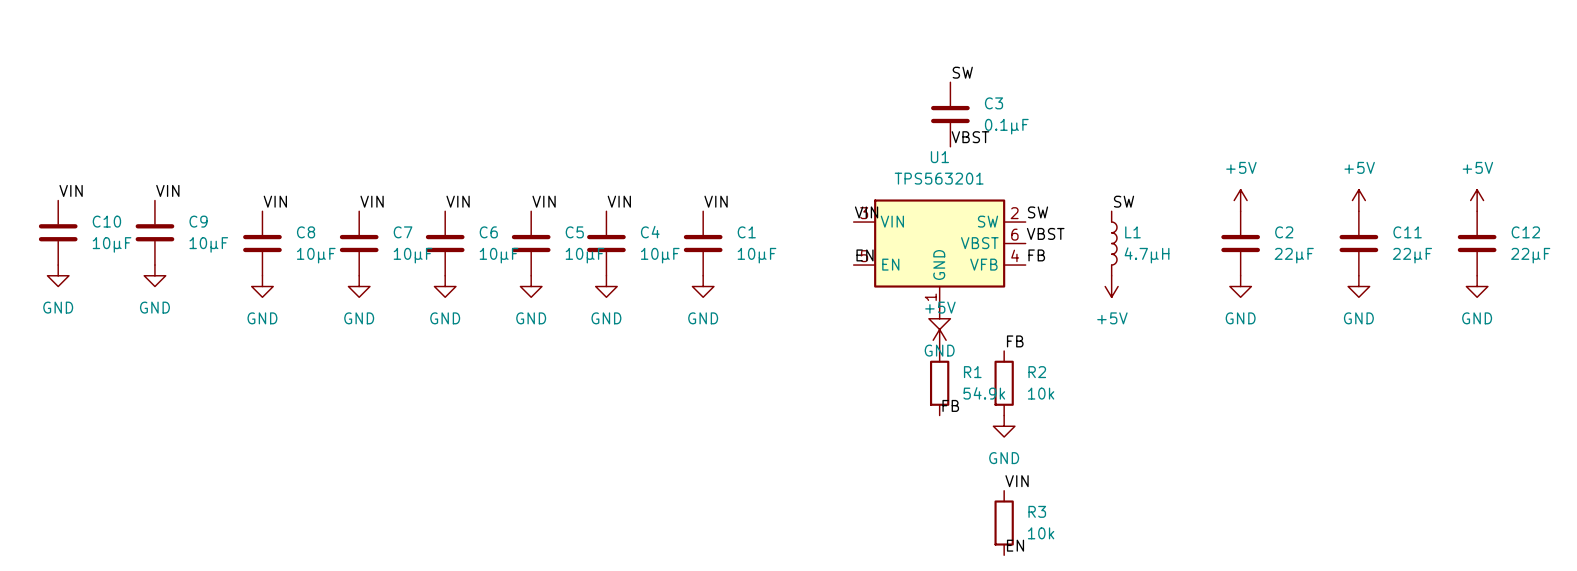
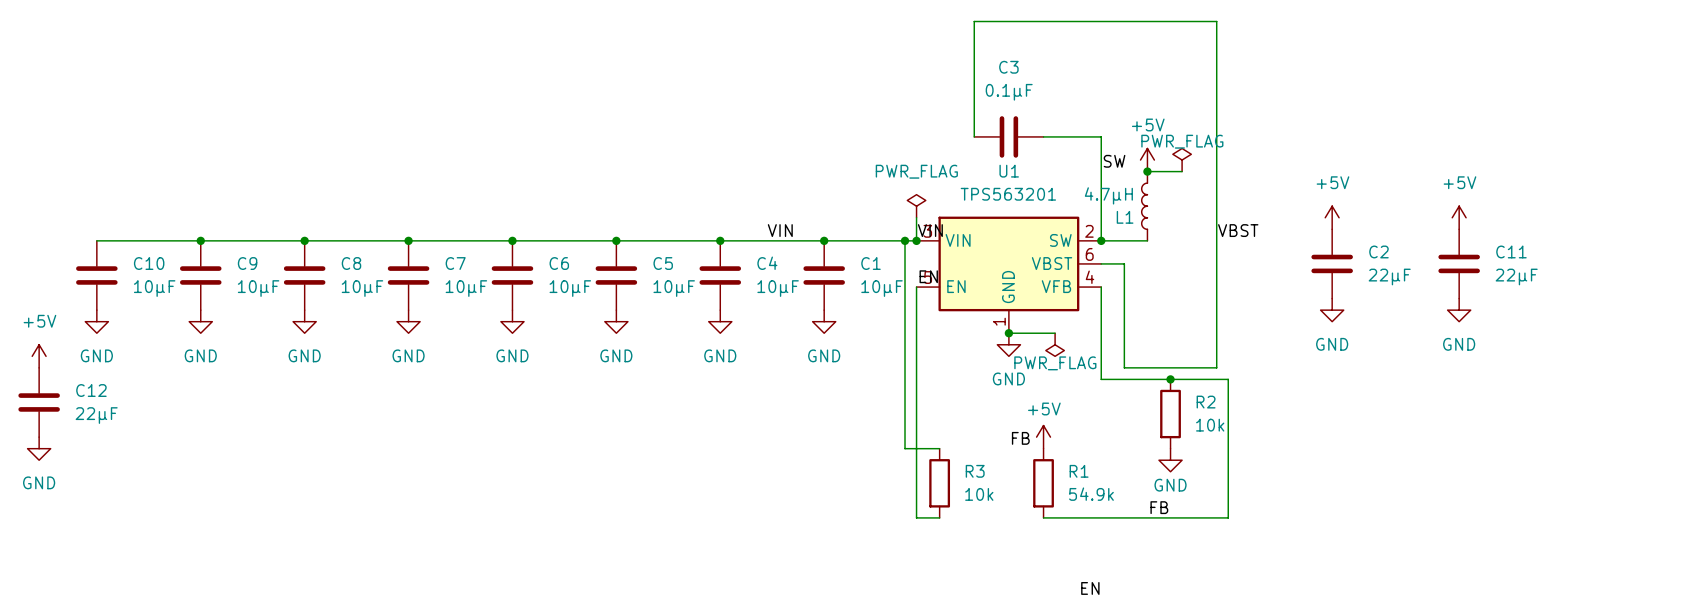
label: SW (962, 72) -> none
C3 name position: C3 (994, 103) -> C3 (1008, 67)
C3 rotation: 0° (950, 114) -> 90° clockwise (1008, 136)
wire: none -> (974, 136) (974, 21) (1216, 21) (1216, 367) (1124, 367) (1124, 263) (1101, 263)
wire: none -> (1043, 136) (1101, 136) (1101, 240) (1147, 240)
C3 value position: 0.1µF (1006, 126) -> 0.1µF (1009, 92)
label: VBST (970, 137) -> none
power symbol: none -> +5V (1147, 160)
power symbol: none -> PWR_FLAG (1182, 160)
label: none -> SW (1114, 161)
wire: none -> (1147, 171) (1182, 171)
junction: none -> (1147, 171)
power symbol: none -> PWR_FLAG (916, 206)
label: VIN (71, 190) -> none
label: VIN (167, 190) -> none
wire: none -> (916, 217) (916, 240) (96, 240)
power symbol: +5V (1477, 200) -> none
label: VIN (275, 201) -> none
label: VIN (372, 201) -> none
label: VIN (458, 201) -> none
label: VIN (544, 201) -> none
label: VIN (619, 201) -> none
label position: VIN (716, 201) -> VIN (780, 230)
label: SW (1124, 201) -> none
label: SW (1038, 212) -> none
label: none -> VBST (1238, 230)
junction: none -> (200, 240)
junction: none -> (304, 240)
junction: none -> (408, 240)
junction: none -> (512, 240)
junction: none -> (616, 240)
junction: none -> (720, 240)
junction: none -> (824, 240)
wire: none -> (905, 240) (905, 448) (939, 448)
junction: none -> (905, 240)
junction: none -> (916, 240)
junction: none -> (1101, 240)
C10 position: (58, 232) -> (96, 275)
C9 position: (154, 232) -> (200, 275)
label: VBST (1045, 233) -> none
C8 position: (262, 243) -> (304, 275)
C7 position: (359, 243) -> (408, 275)
C6 position: (445, 243) -> (512, 275)
C5 position: (531, 243) -> (616, 275)
C4 position: (606, 243) -> (720, 275)
C1 position: (703, 243) -> (824, 275)
L1 rotation: 0° (1114, 243) -> 180° (1144, 206)
L1 position: (1114, 243) -> (1144, 206)
C12 position: (1477, 243) -> (39, 402)
label: FB (1036, 255) -> none
wire: none -> (916, 287) (916, 517) (939, 517)
wire: none -> (1101, 287) (1101, 379) (1228, 379) (1228, 517) (1043, 517)
power symbol: GND (58, 275) -> none
power symbol: GND (154, 275) -> none
power symbol position: GND (262, 286) -> GND (304, 321)
power symbol position: GND (359, 286) -> GND (408, 321)
power symbol: GND (445, 286) -> none
power symbol: GND (531, 286) -> none
power symbol: GND (606, 286) -> none
power symbol: GND (703, 286) -> none
power symbol: +5V (1111, 286) -> none
power symbol: GND (1477, 286) -> none
power symbol: none -> GND (96, 321)
power symbol: none -> GND (200, 321)
power symbol: none -> GND (512, 321)
power symbol: none -> GND (616, 321)
power symbol: none -> GND (720, 321)
power symbol: none -> GND (824, 321)
power symbol text position: +5V (940, 307) -> +5V (1044, 408)
wire: none -> (1008, 333) (1055, 333)
junction: none -> (1008, 333)
power symbol: none -> PWR_FLAG (1055, 344)
power symbol: none -> +5V (39, 356)
power symbol position: +5V (939, 340) -> +5V (1043, 437)
label: FB (1015, 341) -> none
junction: none -> (1170, 379)
R1 position: (939, 383) -> (1043, 483)
R2 position: (1004, 383) -> (1170, 414)
power symbol: none -> GND (39, 448)
power symbol position: GND (1004, 426) -> GND (1170, 460)
power symbol text position: GND (1004, 458) -> GND (1170, 485)
label: none -> FB (1159, 507)
label: VIN (1017, 481) -> none
R3 position: (1004, 523) -> (939, 483)

